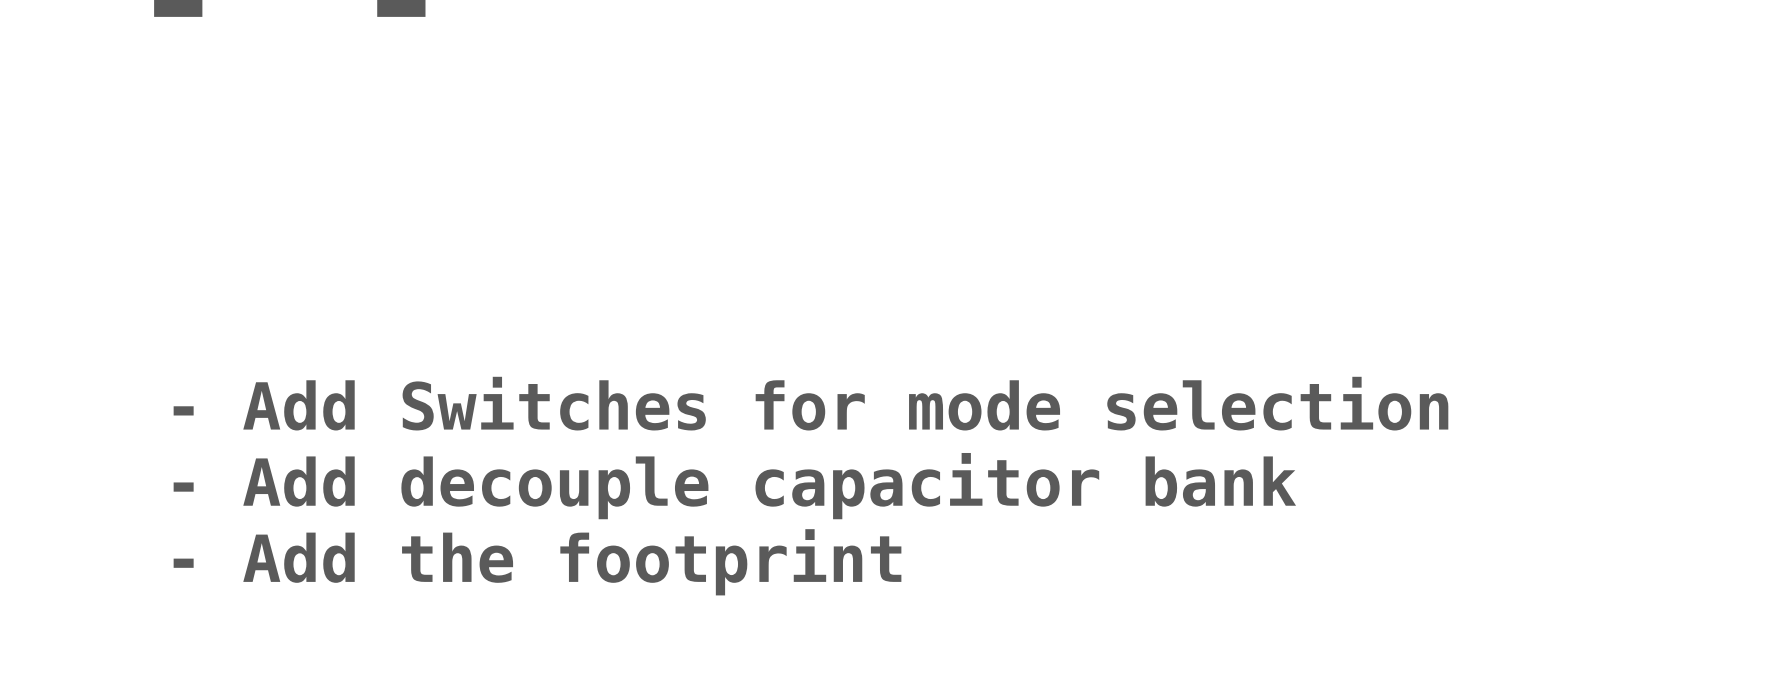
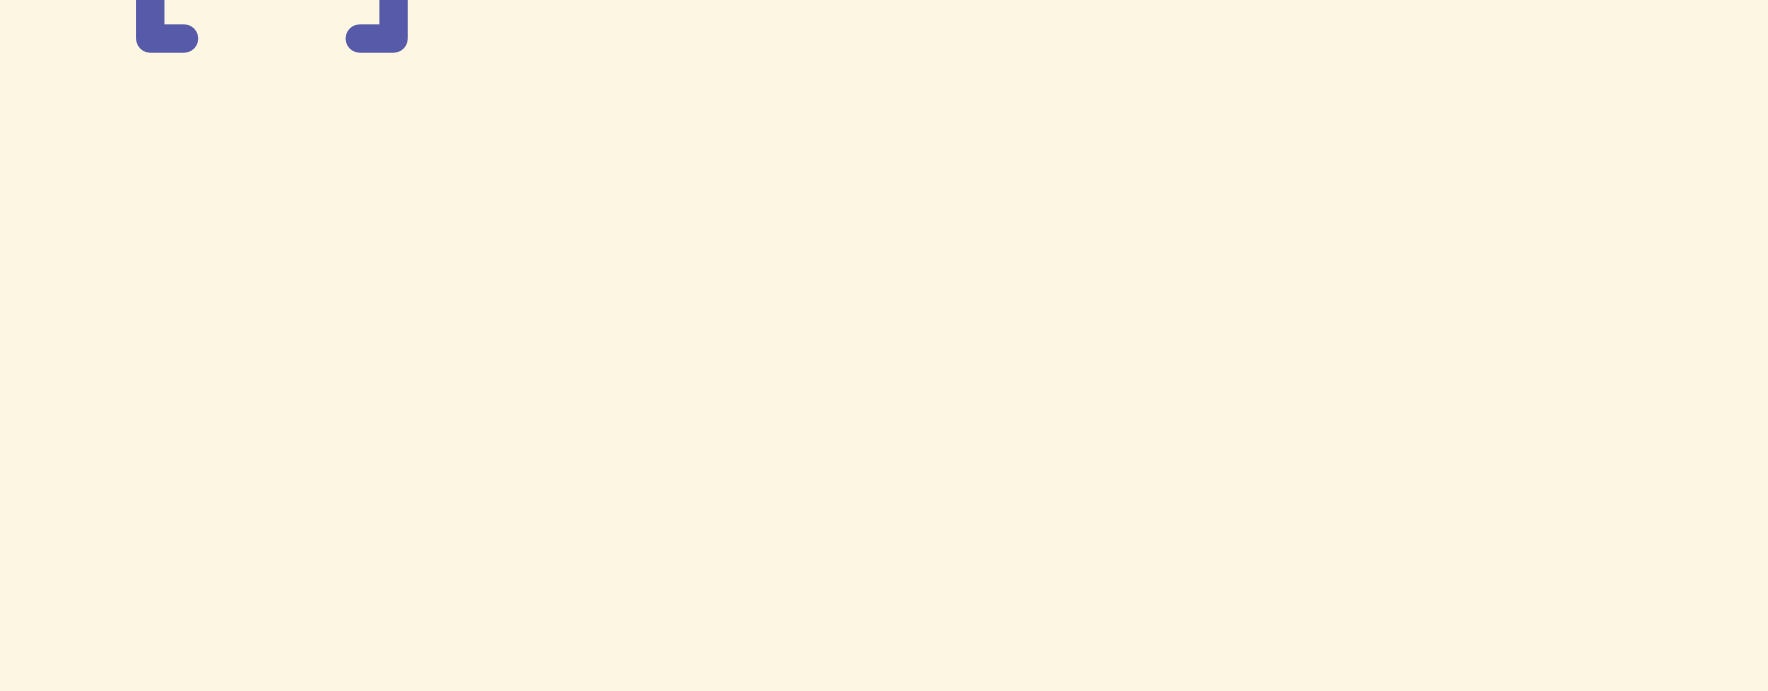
text: - Add Switches for mode selection (810, 403) -> none
text: - Add decouple capacitor bank (734, 486) -> none
text: - Add the footprint (537, 562) -> none

